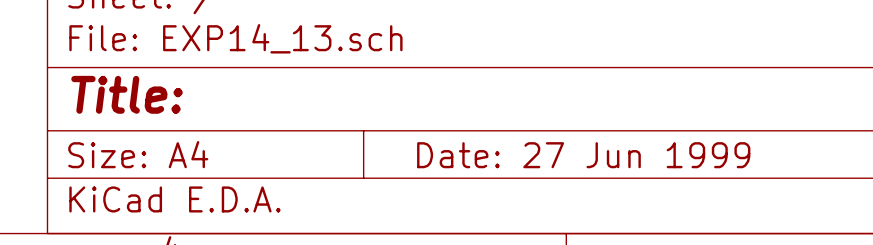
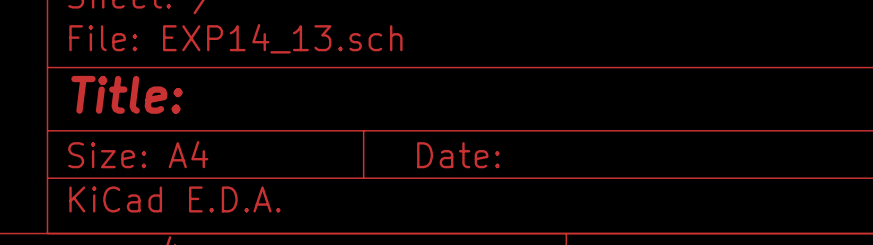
title block: Date: 27 Jun 1999 (583, 155) -> Date: (458, 155)

